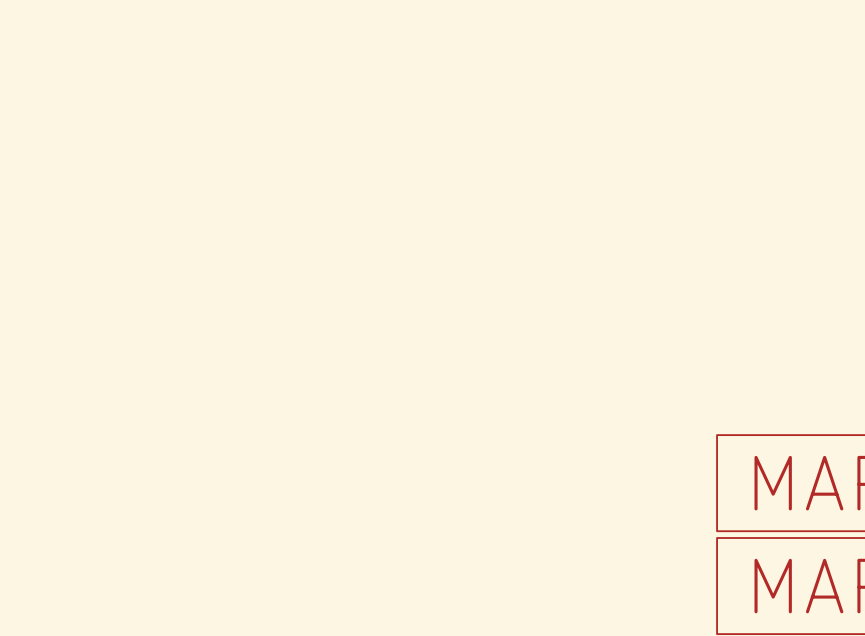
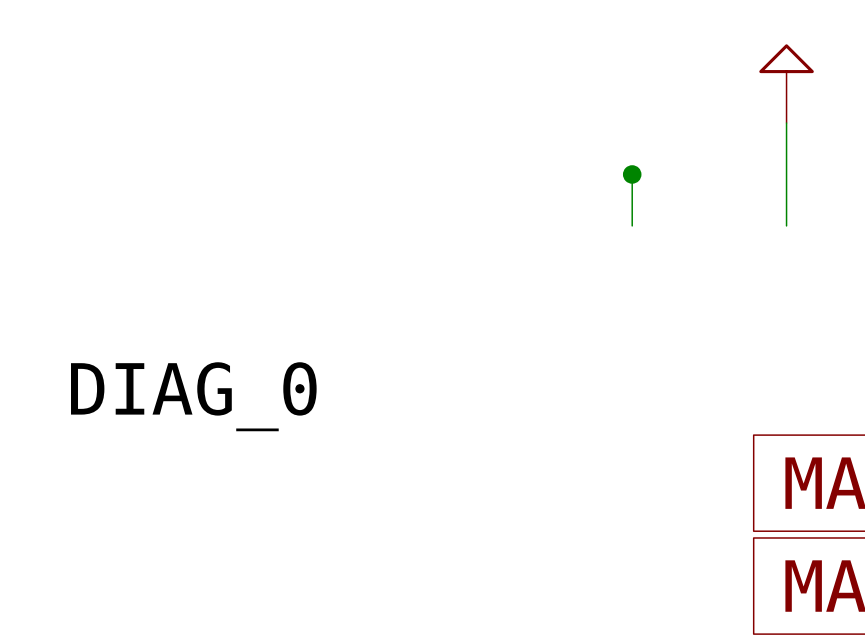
power symbol: none -> (786, 83)
wire: none -> (786, 123) (786, 225)
wire: none -> (632, 174) (632, 225)
junction: none -> (632, 174)
label: none -> DIAG_0 (193, 396)

